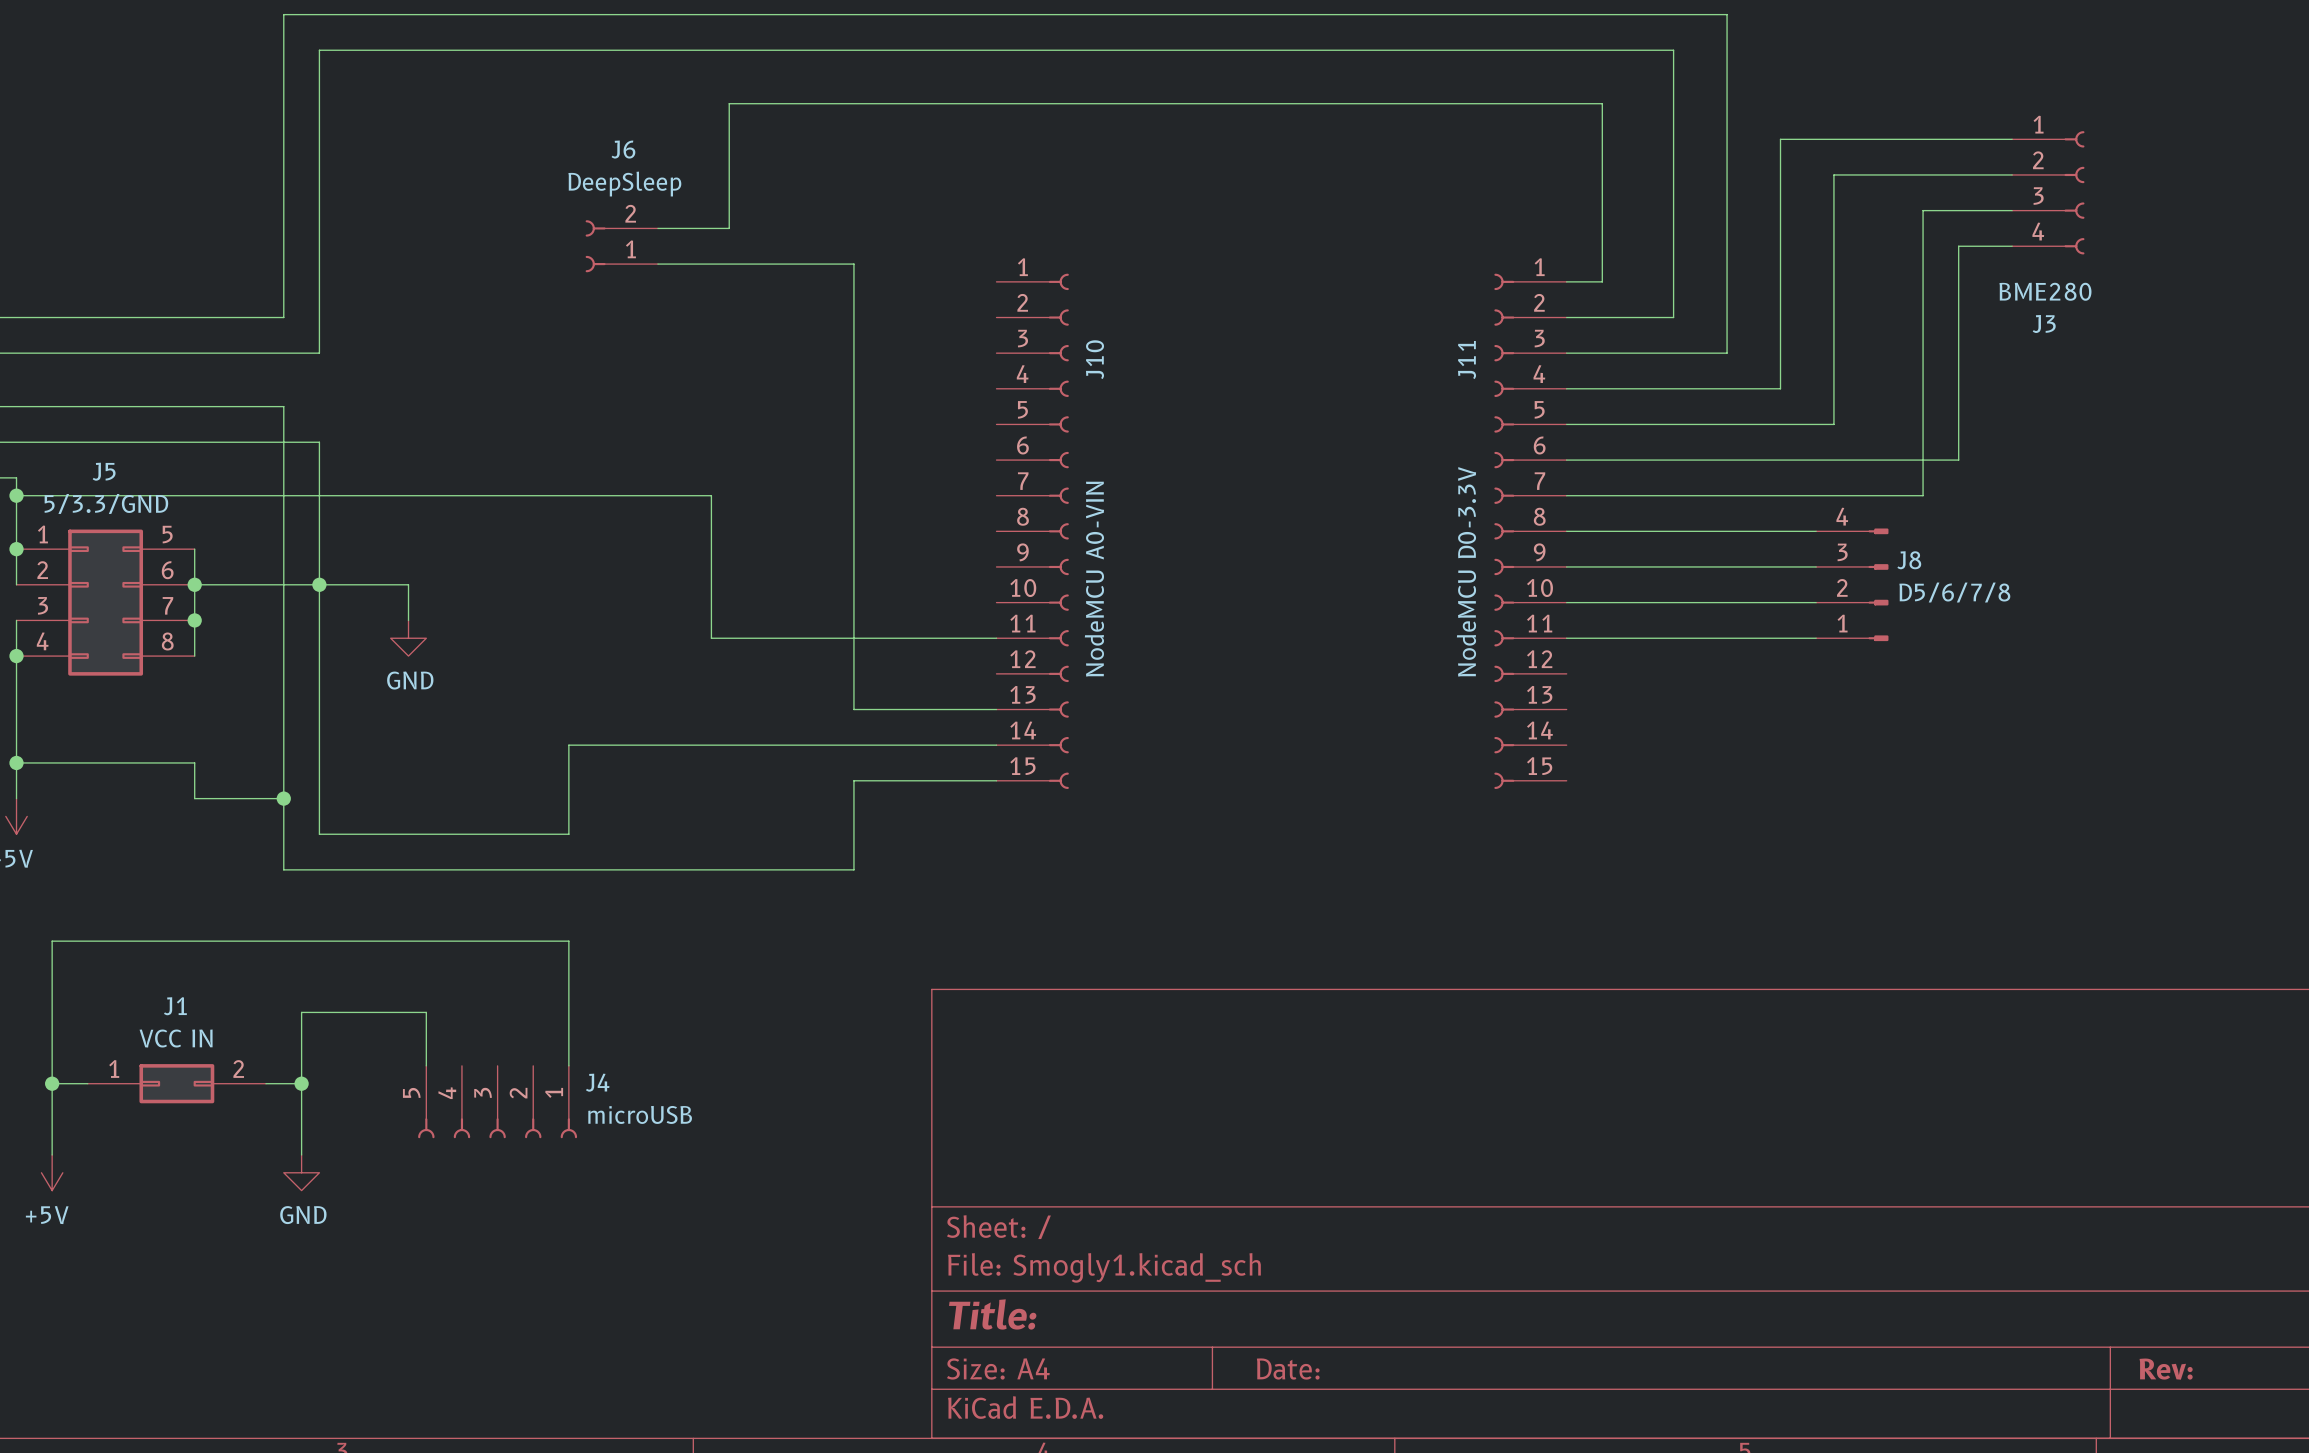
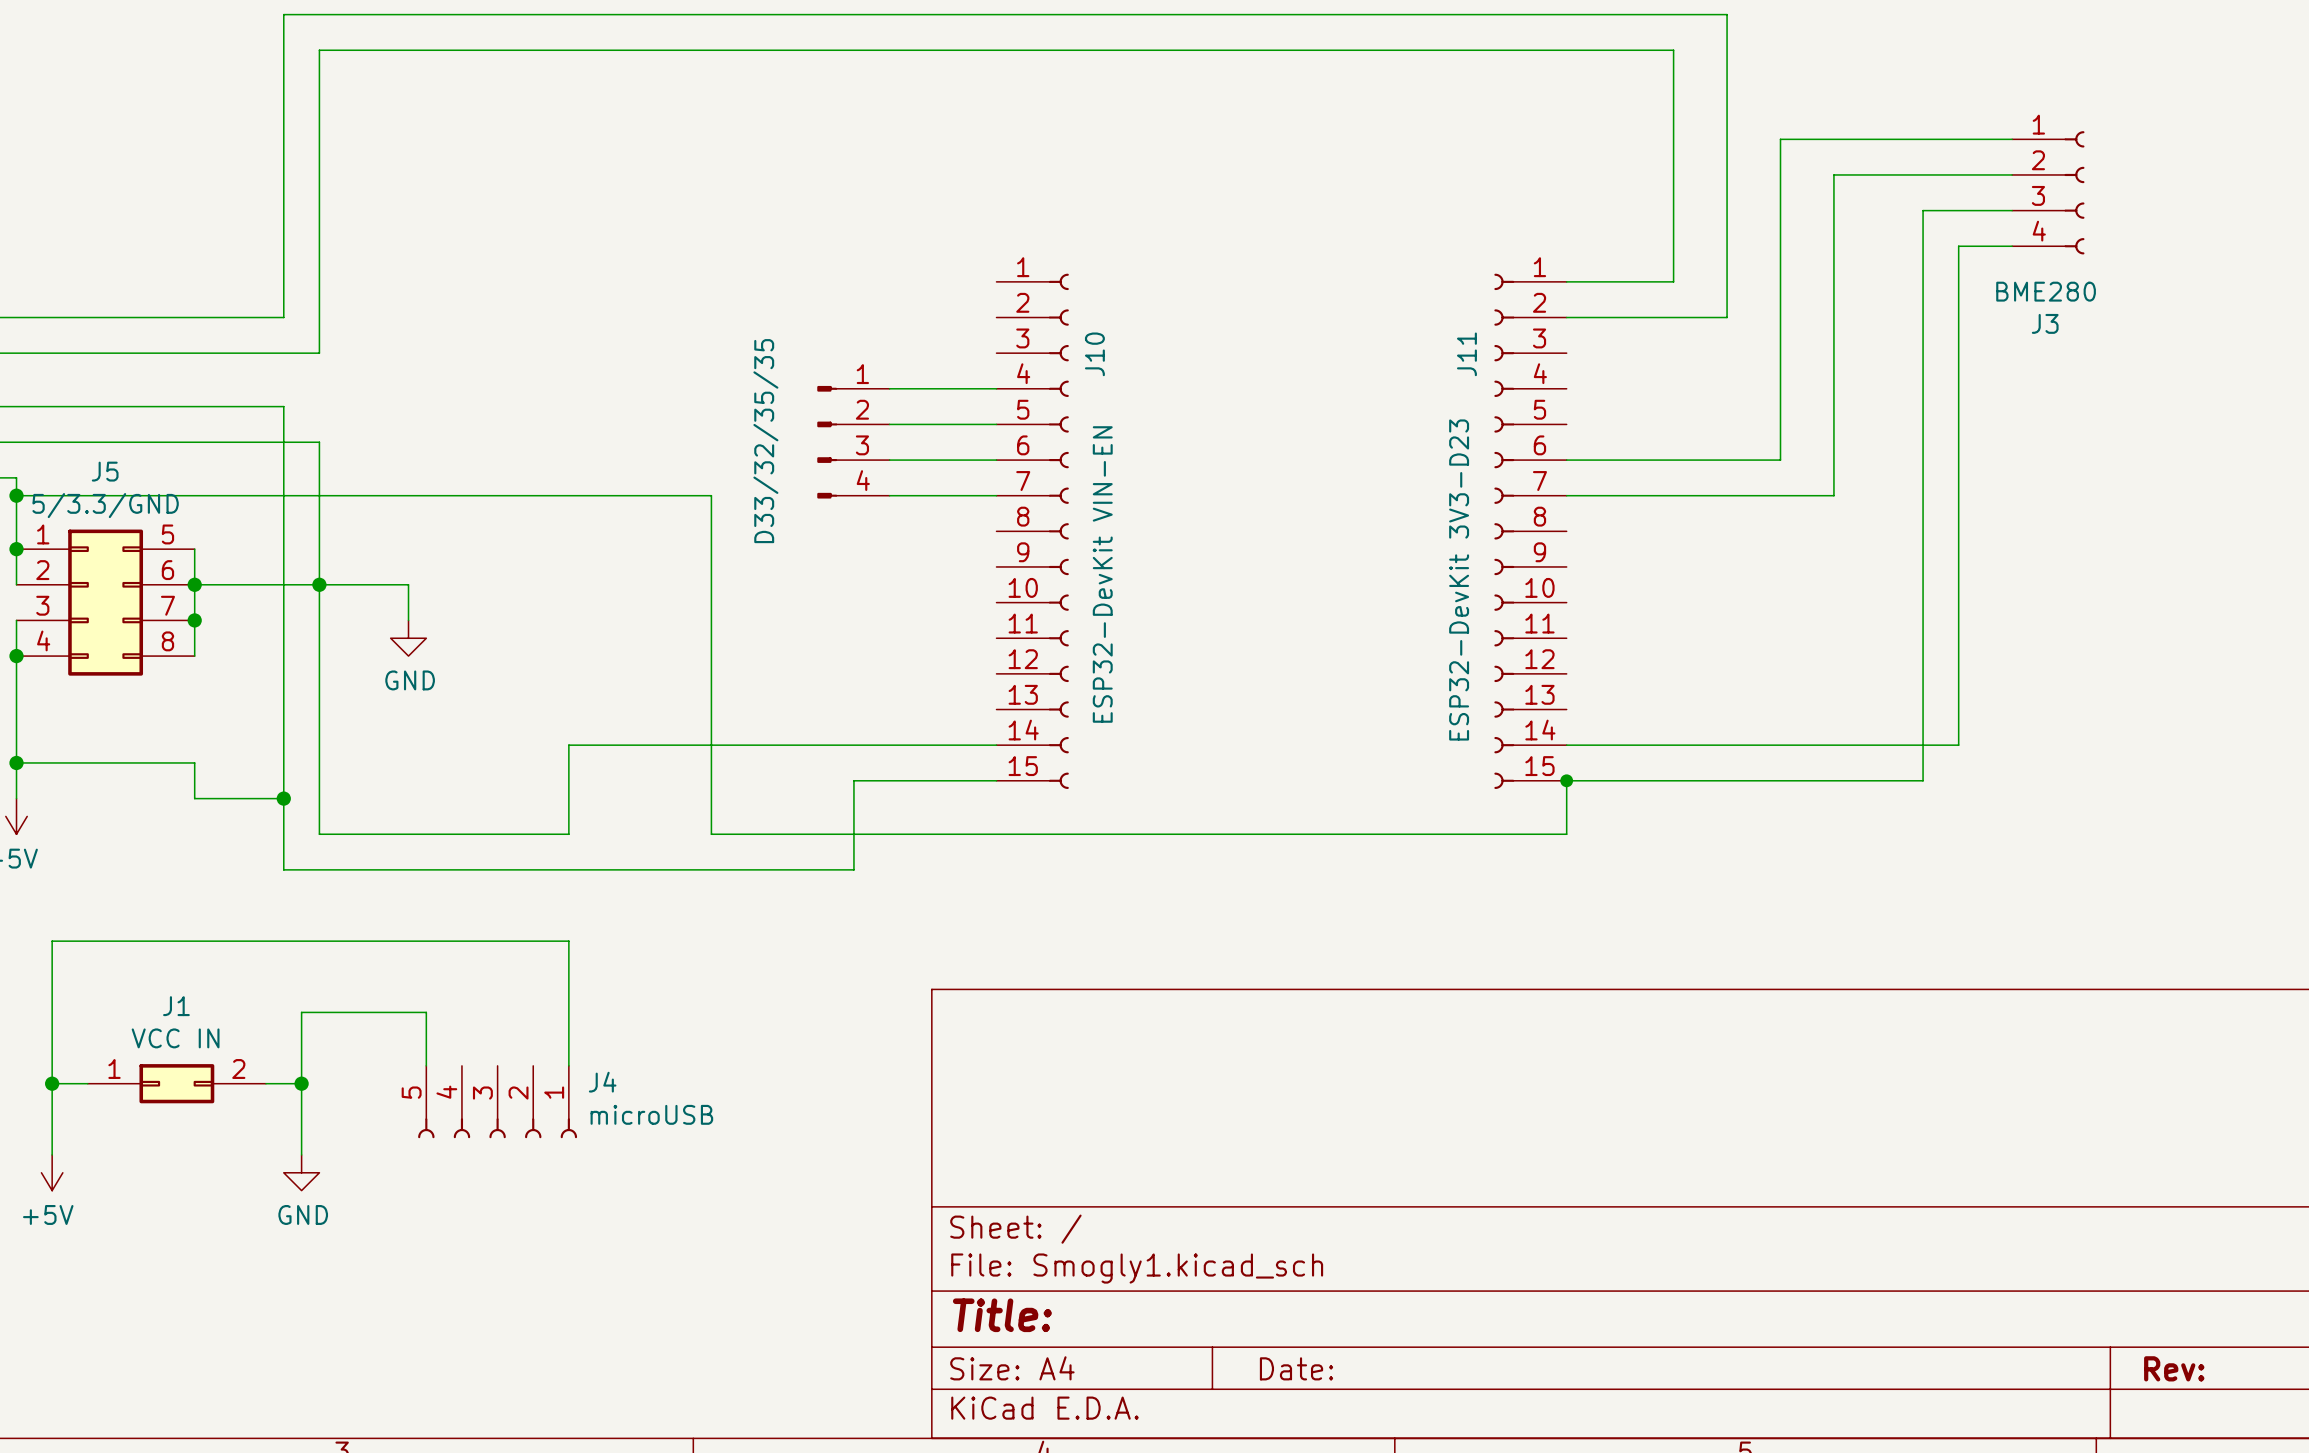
wire: (657, 228) (729, 228) (729, 103) (1602, 103) (1602, 281) -> (1673, 281) (1602, 281)
J6: DeepSleep (621, 246) -> none
wire: (657, 264) (853, 264) (853, 709) (996, 709) -> none
wire: (1673, 281) (1673, 317) -> (1727, 317) (1673, 317)
wire: (1727, 317) (1727, 353) (1566, 353) -> none
wire: none -> (889, 388) (996, 388)
wire: (1566, 388) (1780, 388) -> none
wire: none -> (889, 424) (996, 424)
wire: (1566, 424) (1833, 424) -> none
part: none -> D33/32/35/35 (853, 442)
wire: none -> (889, 460) (996, 460)
wire: (1780, 460) (1958, 460) -> (1780, 460) (1780, 388)
wire: none -> (1958, 460) (1958, 745) (1566, 745)
wire: none -> (889, 495) (996, 495)
wire: (1833, 495) (1923, 495) -> (1833, 495) (1833, 424)
wire: (1566, 531) (1816, 531) -> none
wire: (1566, 566) (1816, 566) -> none
J11 value: NodeMCU D0-3.3V (1466, 571) -> ESP32-DevKit 3V3-D23 (1459, 579)
J10 value: NodeMCU A0-VIN (1094, 579) -> ESP32-DevKit VIN-EN (1102, 574)
J8: D5/6/7/8 (1852, 584) -> none
wire: (1566, 602) (1816, 602) -> none
wire: (711, 638) (996, 638) -> (711, 638) (711, 834) (1566, 834) (1566, 780) (1923, 780) (1923, 495)
wire: (1566, 638) (1816, 638) -> none
junction: none -> (1566, 780)

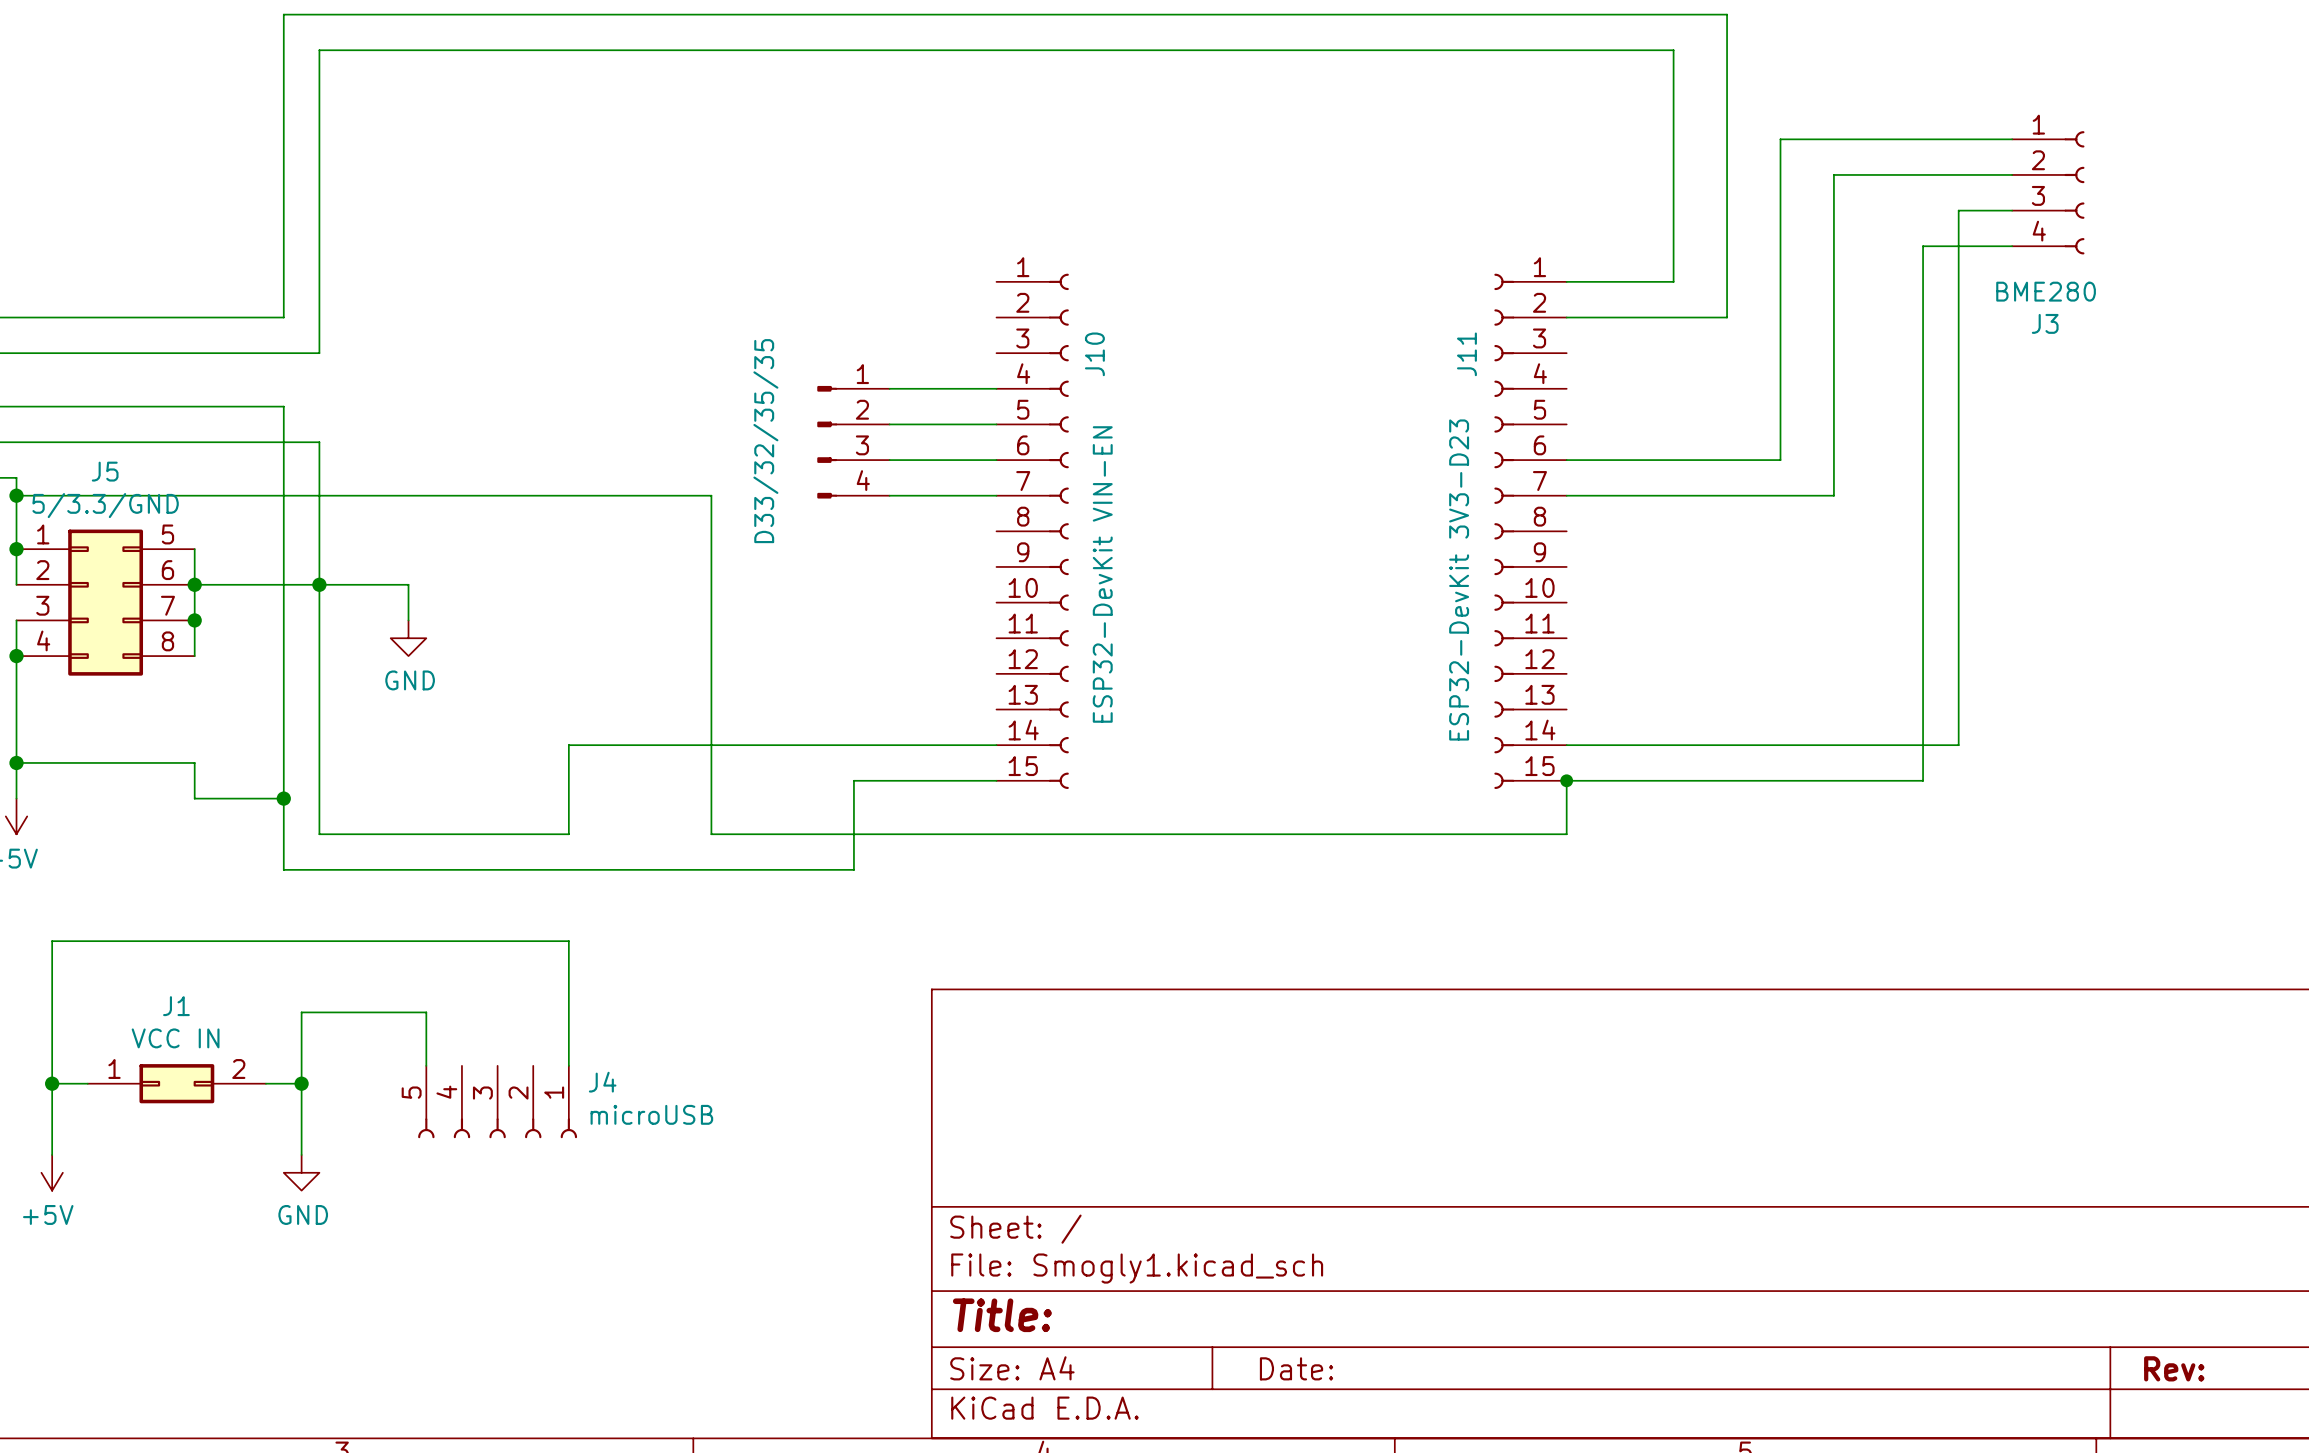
wire: (1958, 210) (1923, 210) (1923, 246) -> (1958, 210) (1958, 246) (1923, 246)

